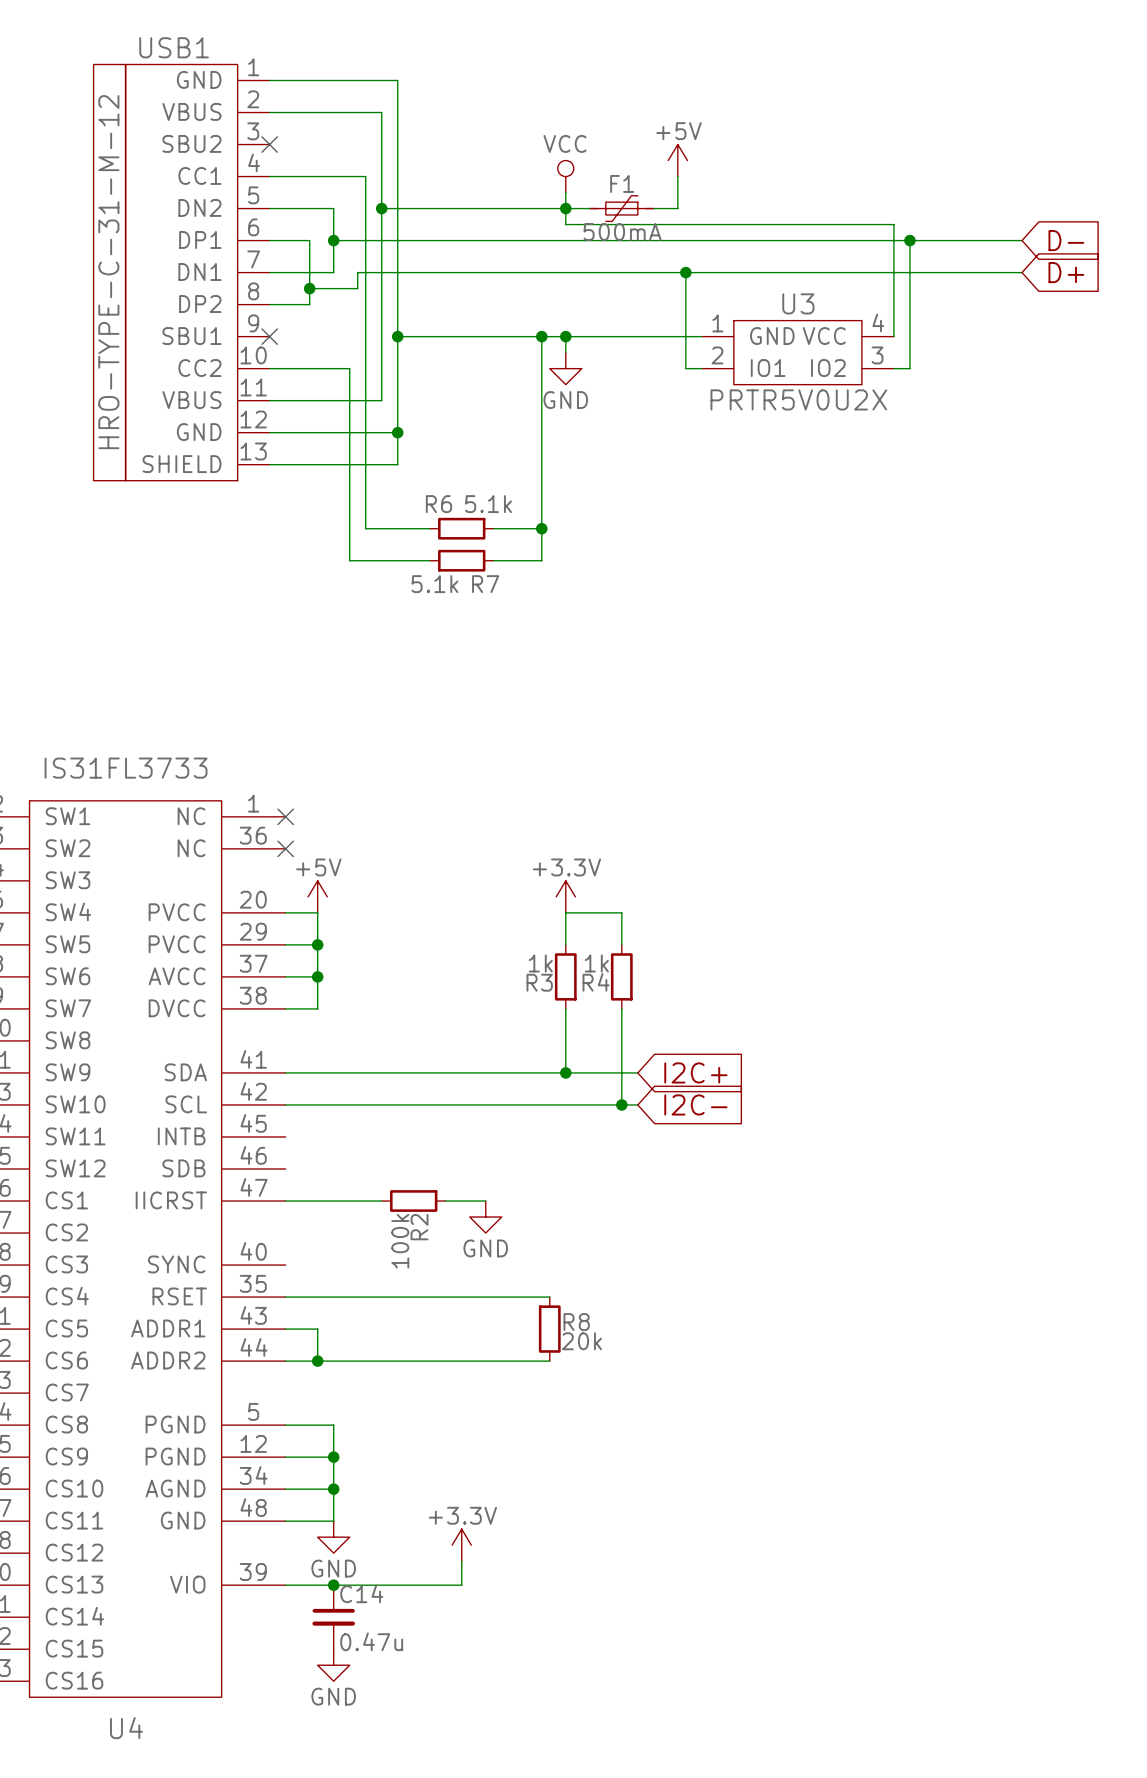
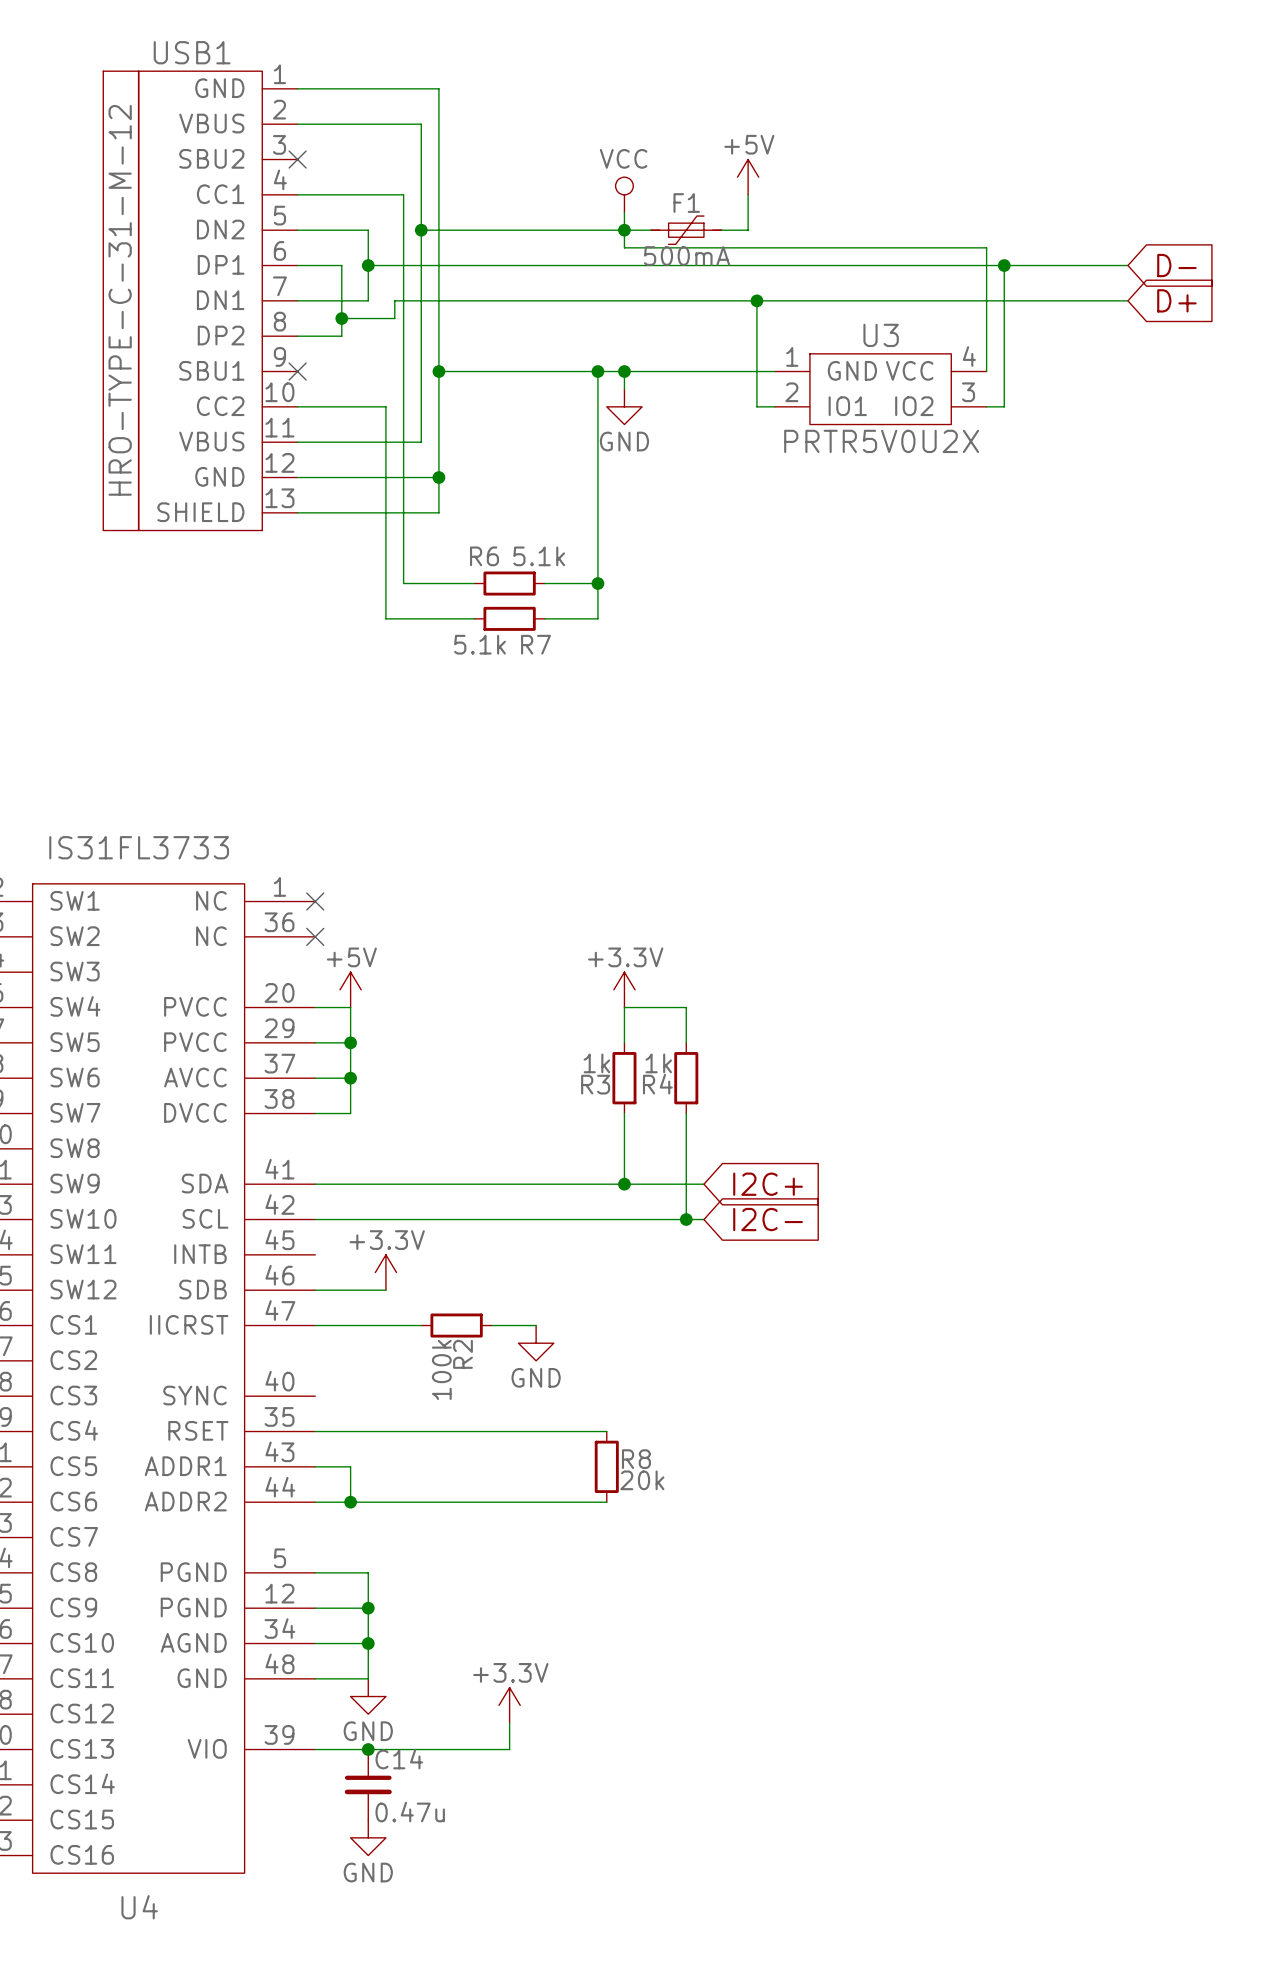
power symbol: none -> +3.3V (385, 1272)
wire: none -> (315, 1290) (385, 1290)

